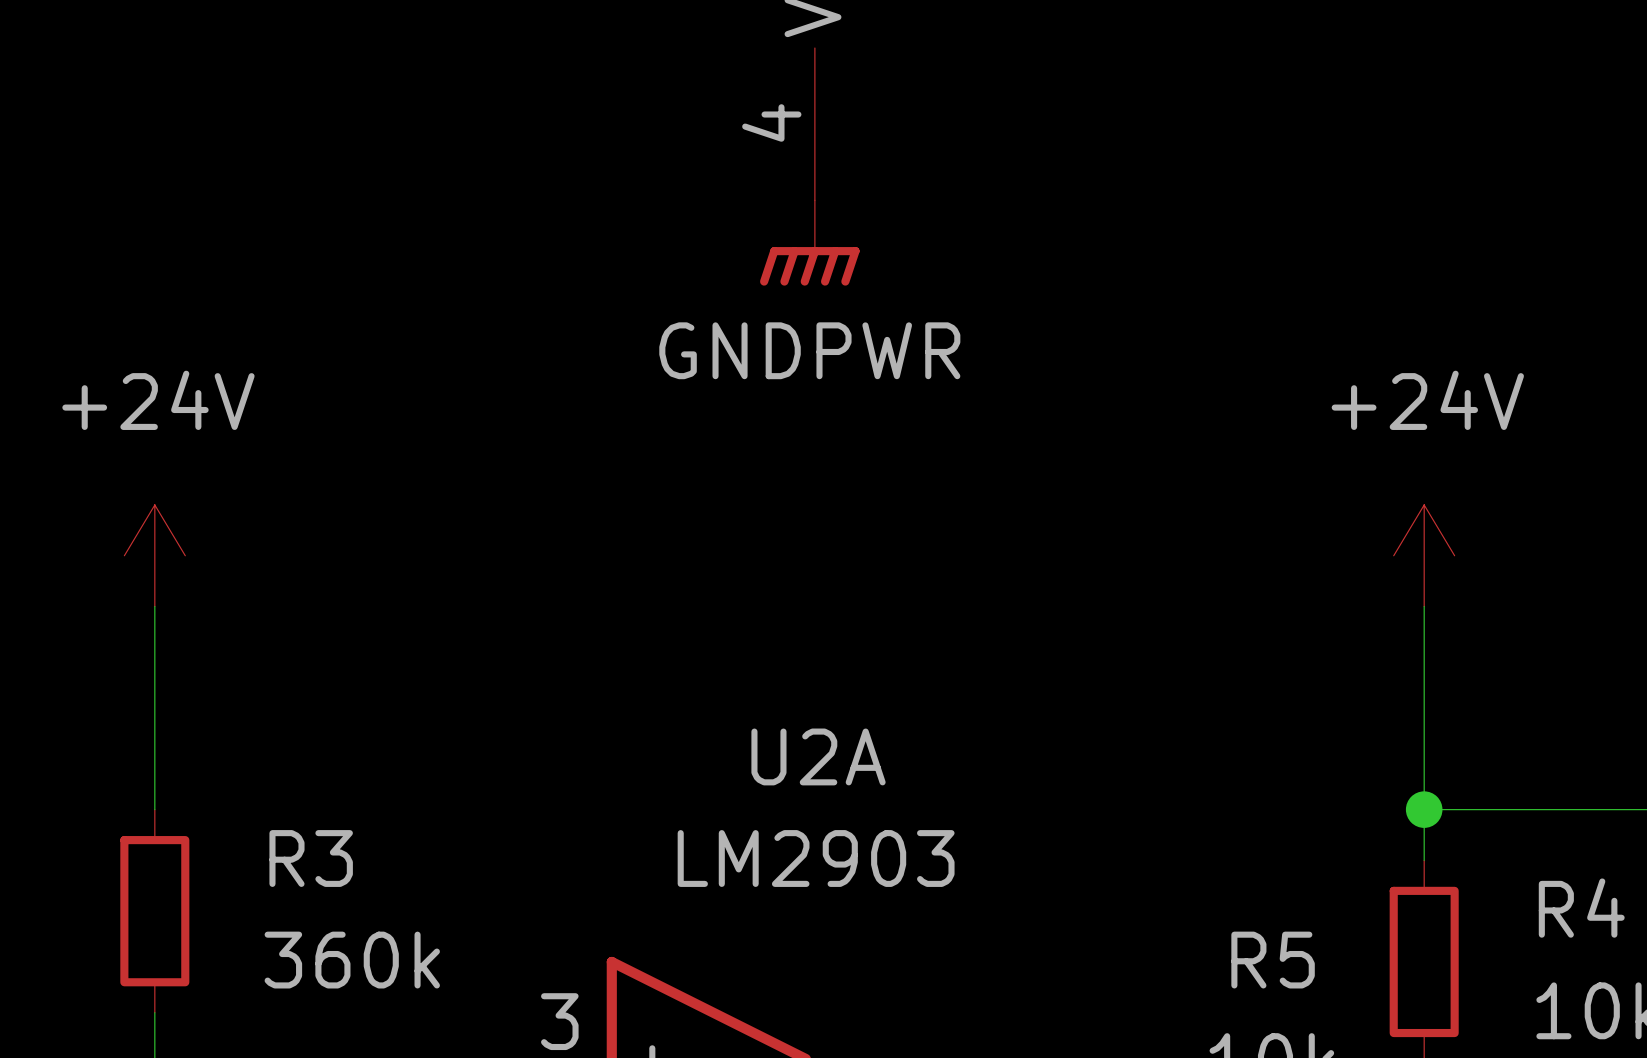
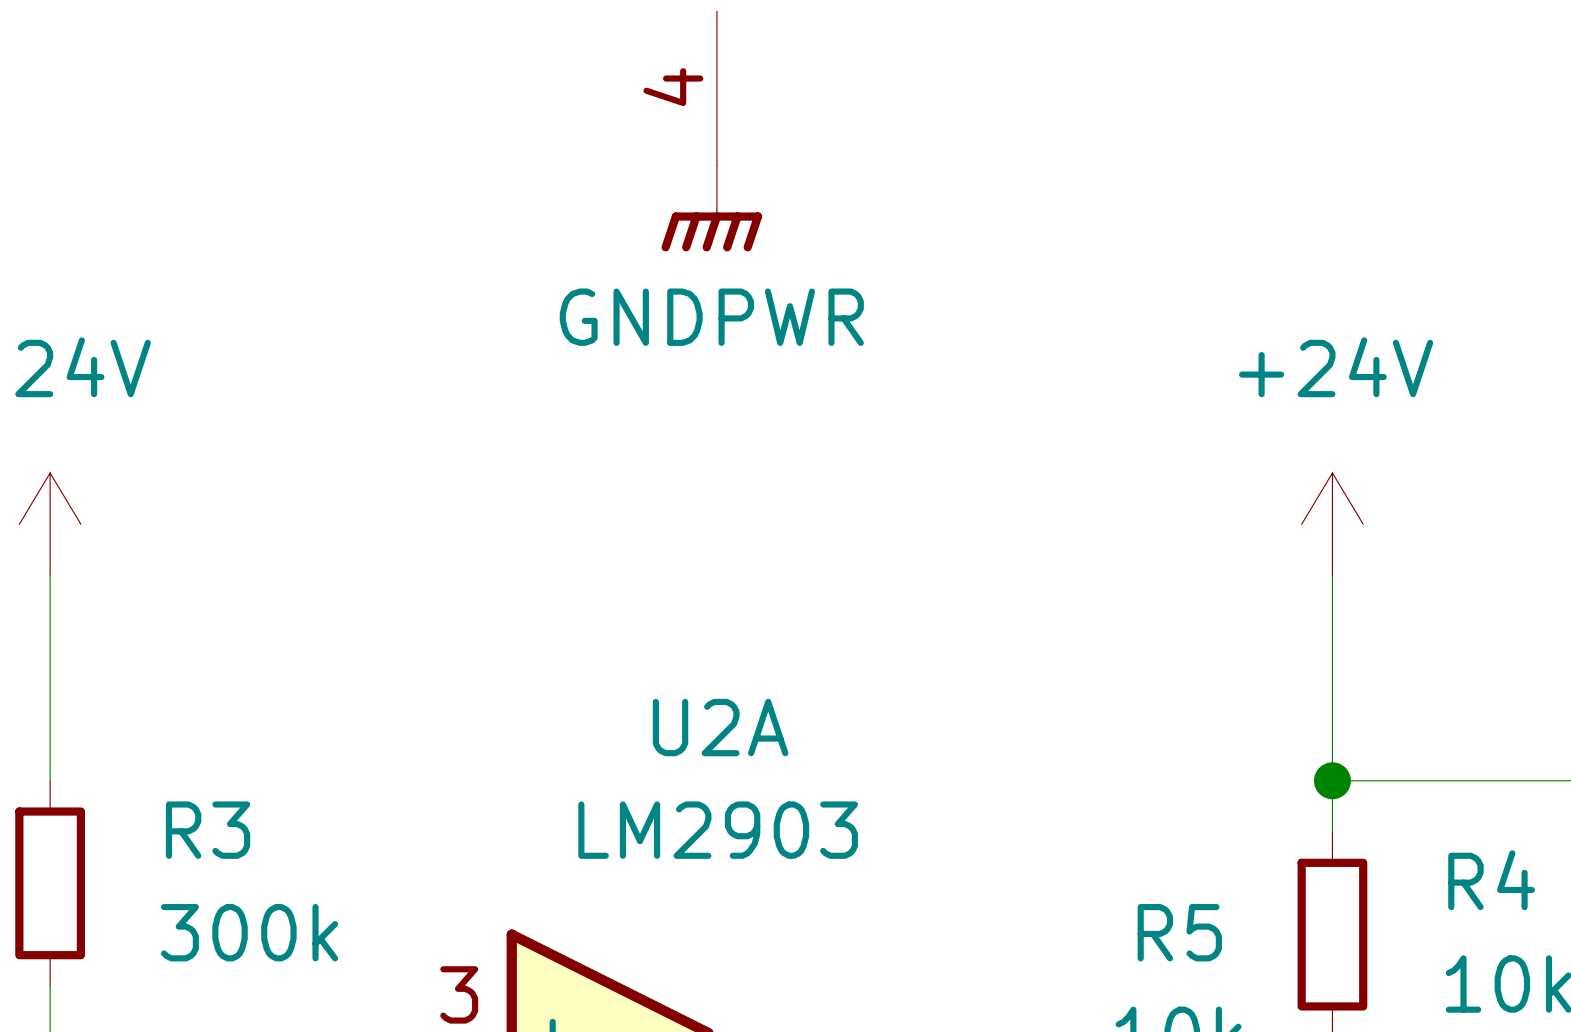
R3 value: 360k (352, 960) -> 300k (249, 932)

